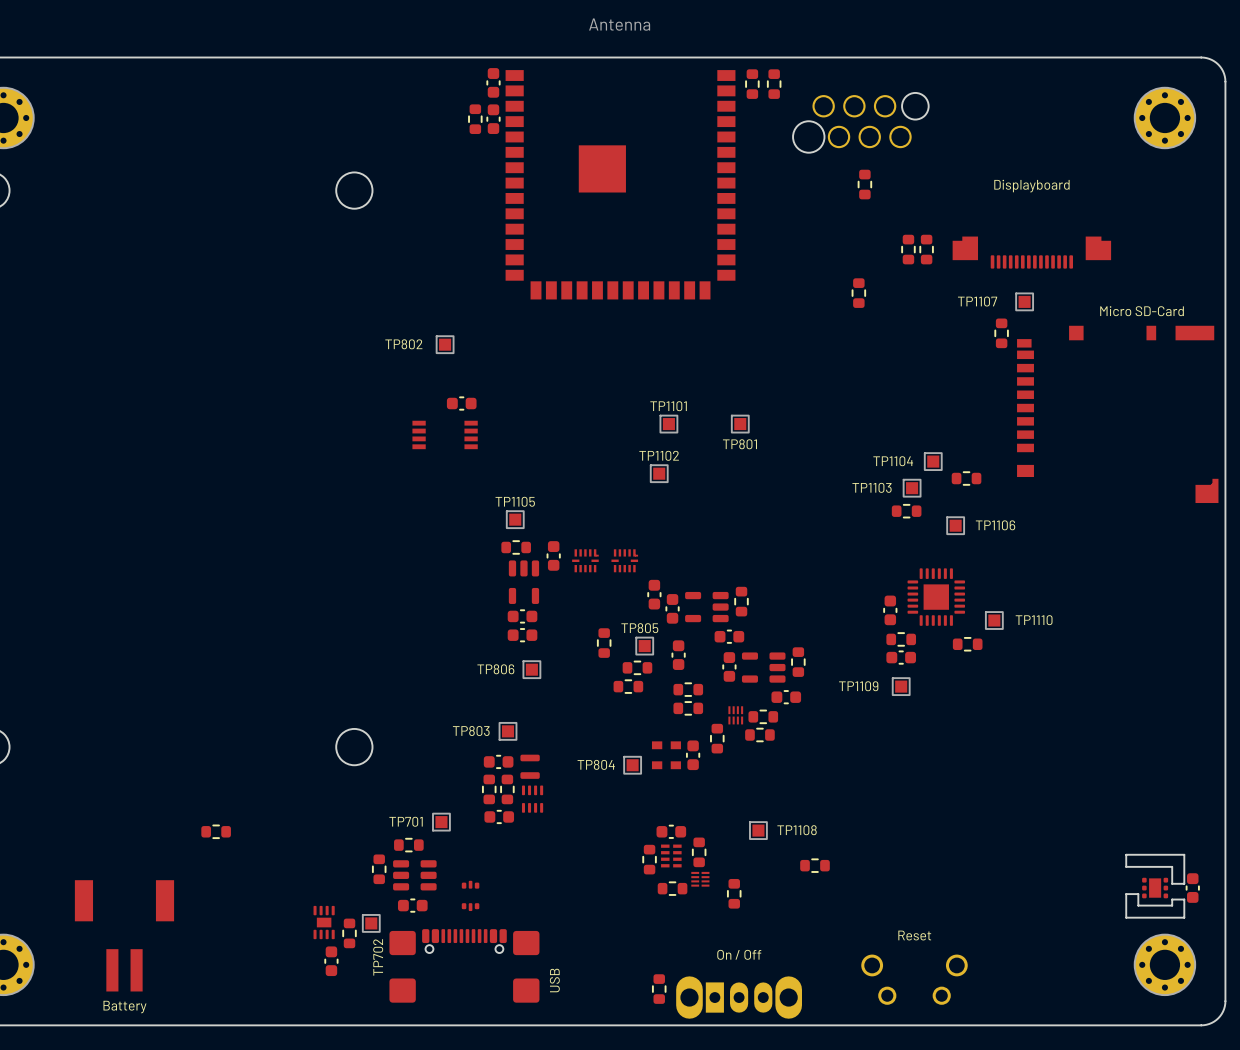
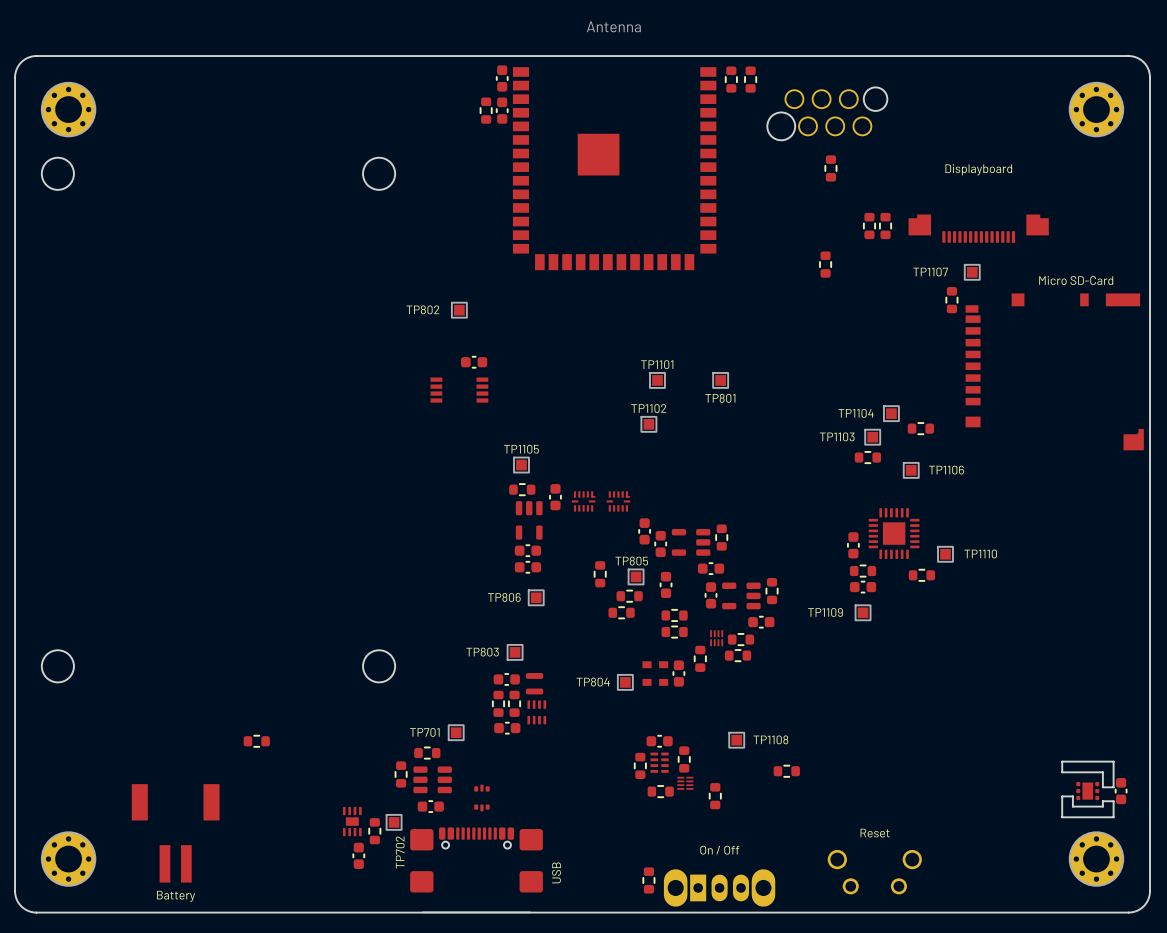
part footprint: [389, 929, 540, 1003] -> [410, 827, 543, 913]

